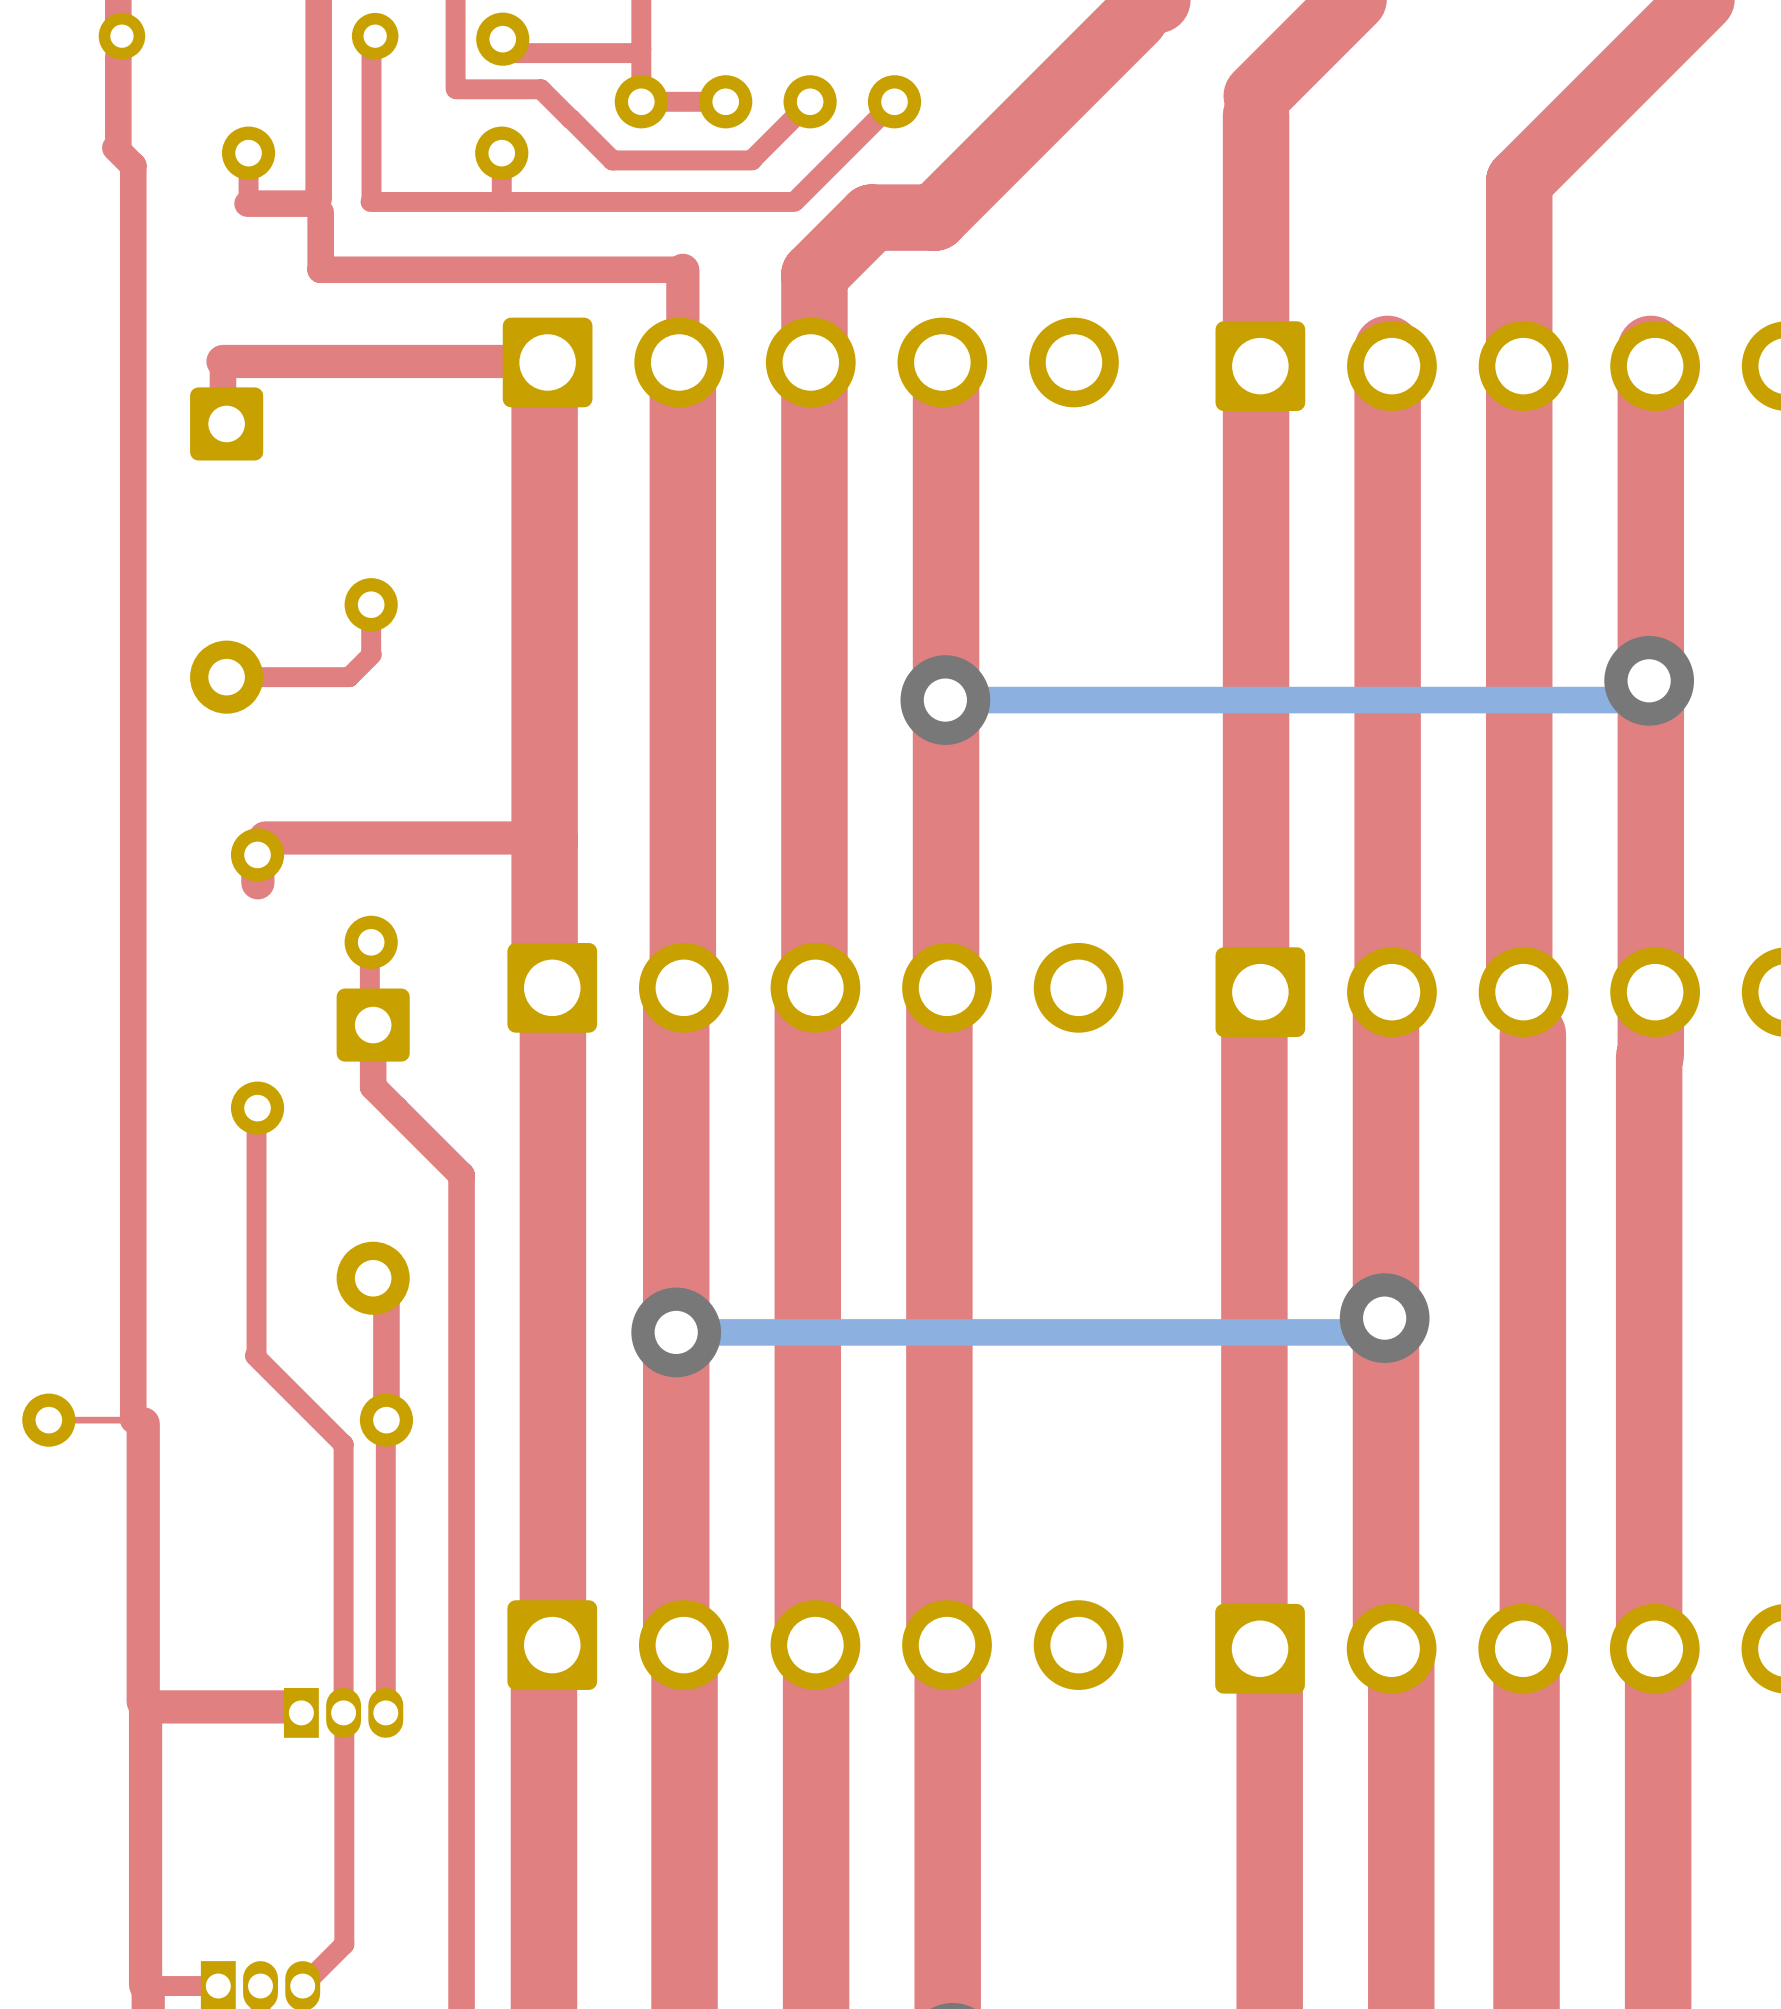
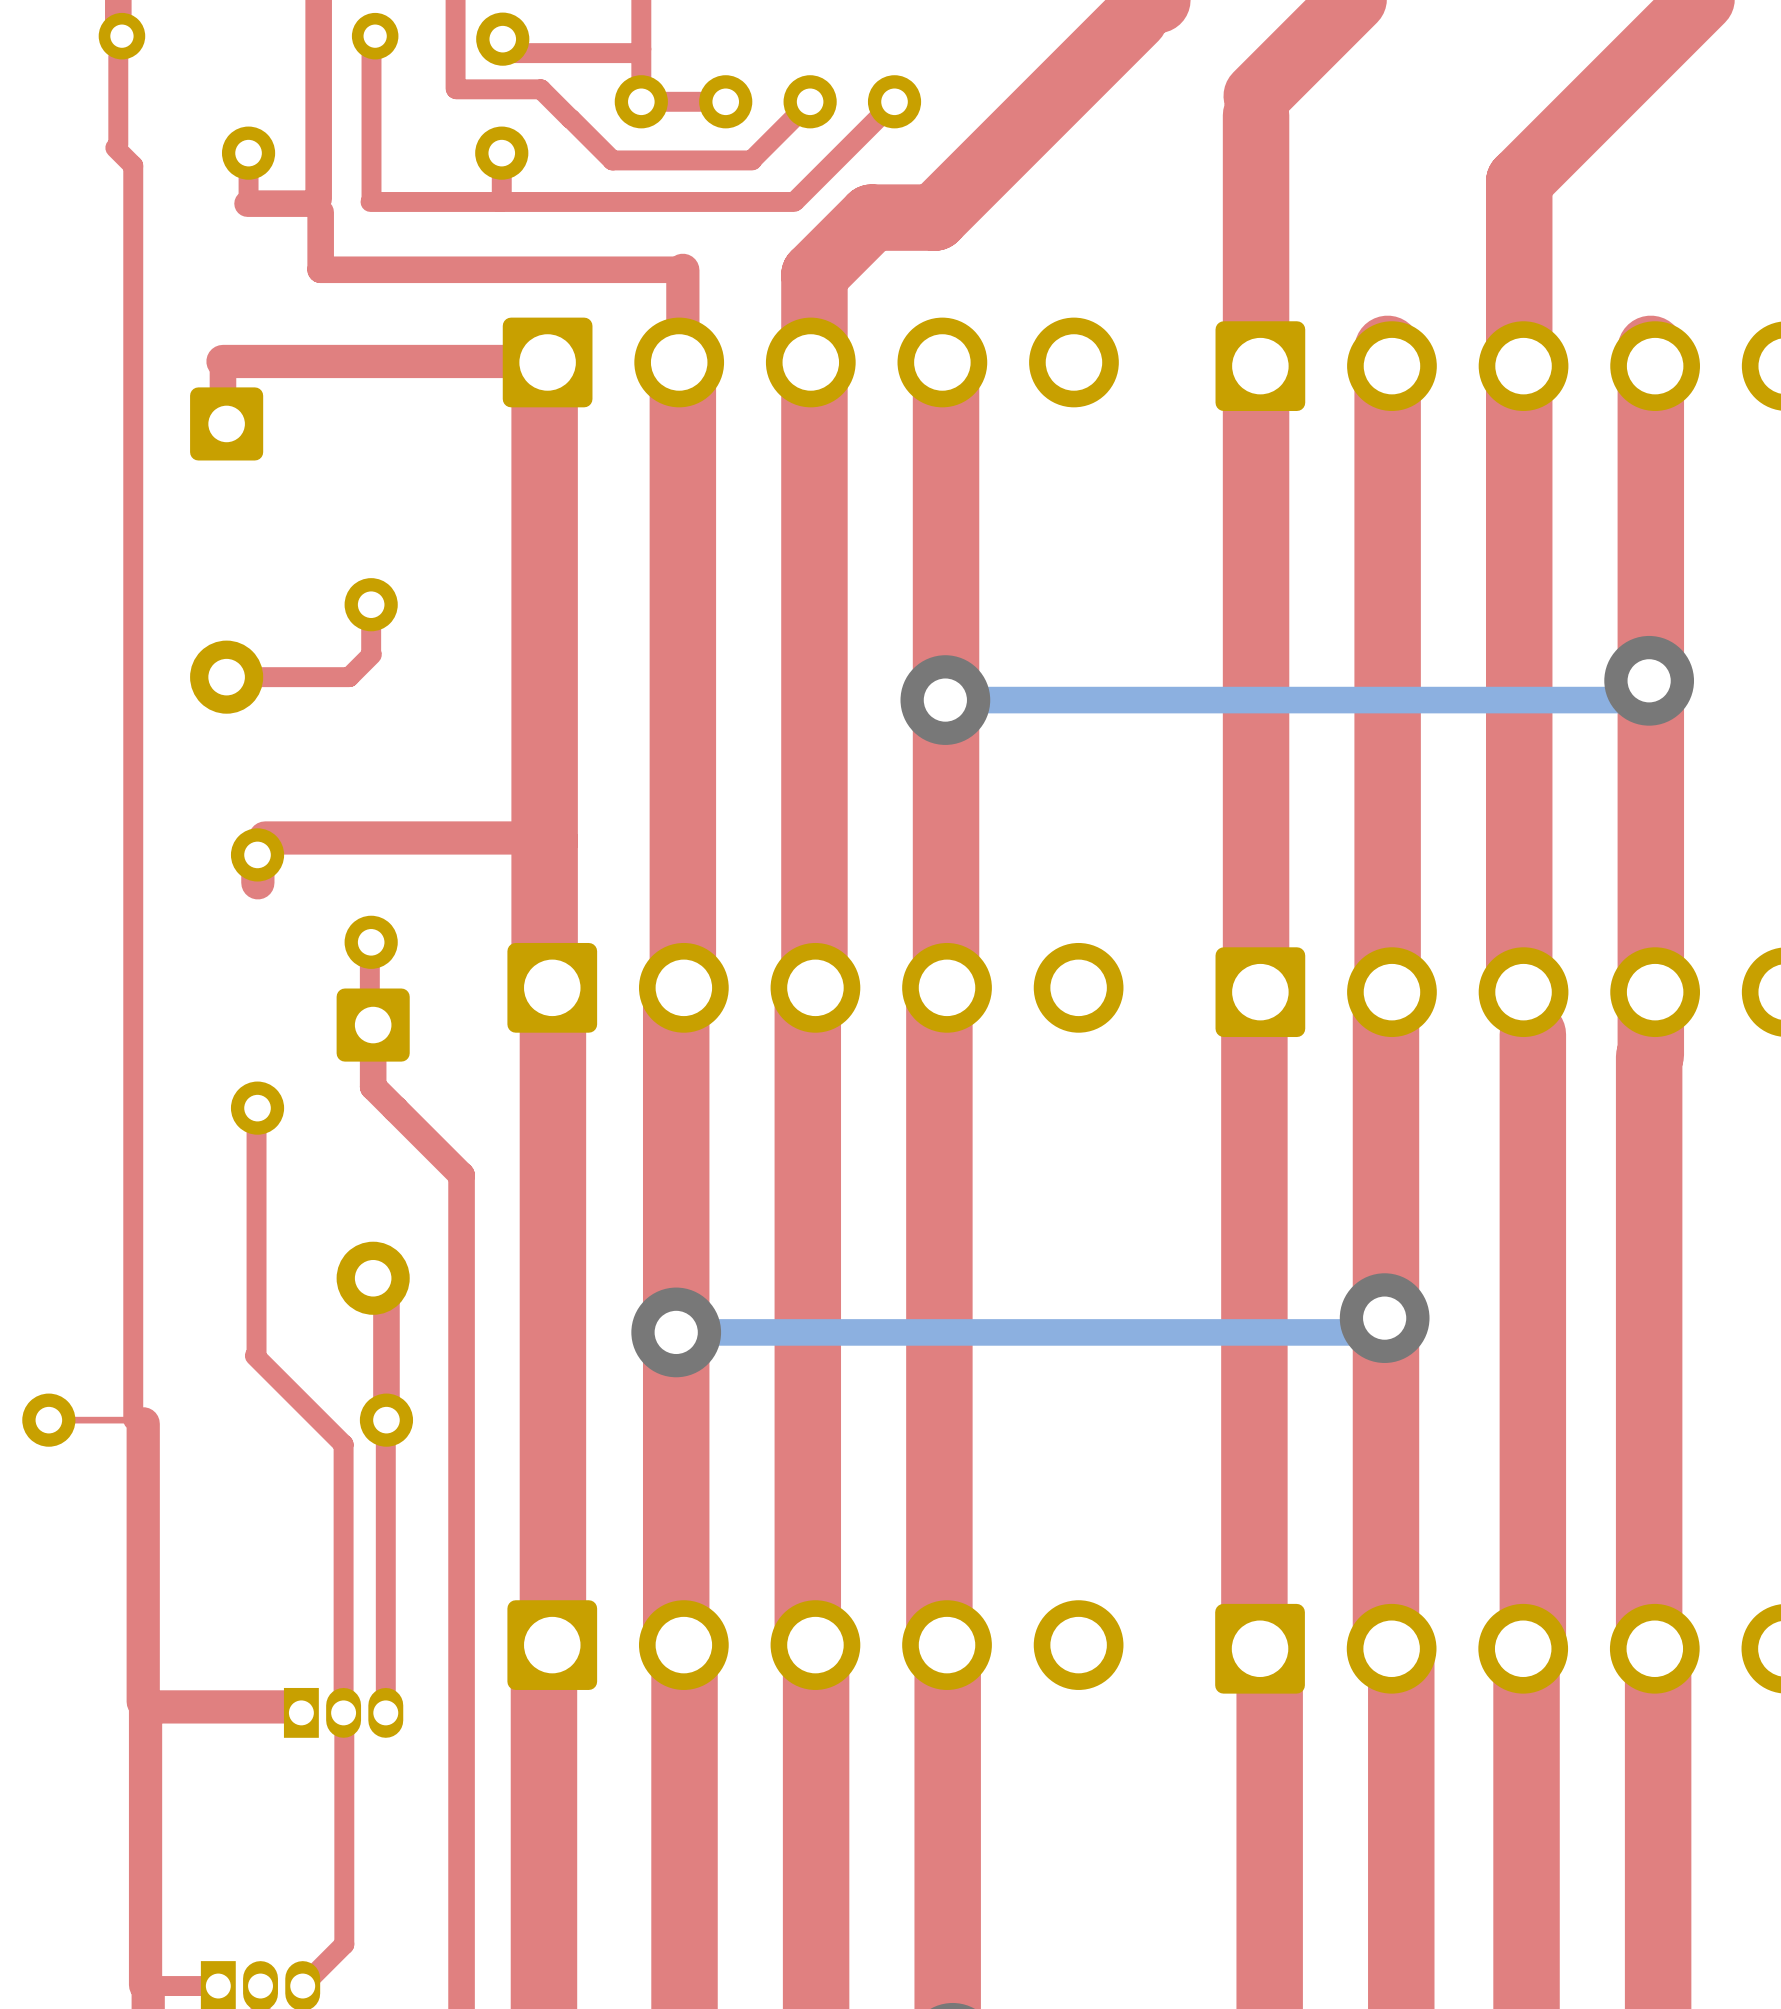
top track width: thick (118, 56) (118, 144) -> thin (118, 56) (118, 144)
top track width: thick (115, 147) (133, 165) (133, 1420) -> thin (115, 147) (133, 165) (133, 1420)

